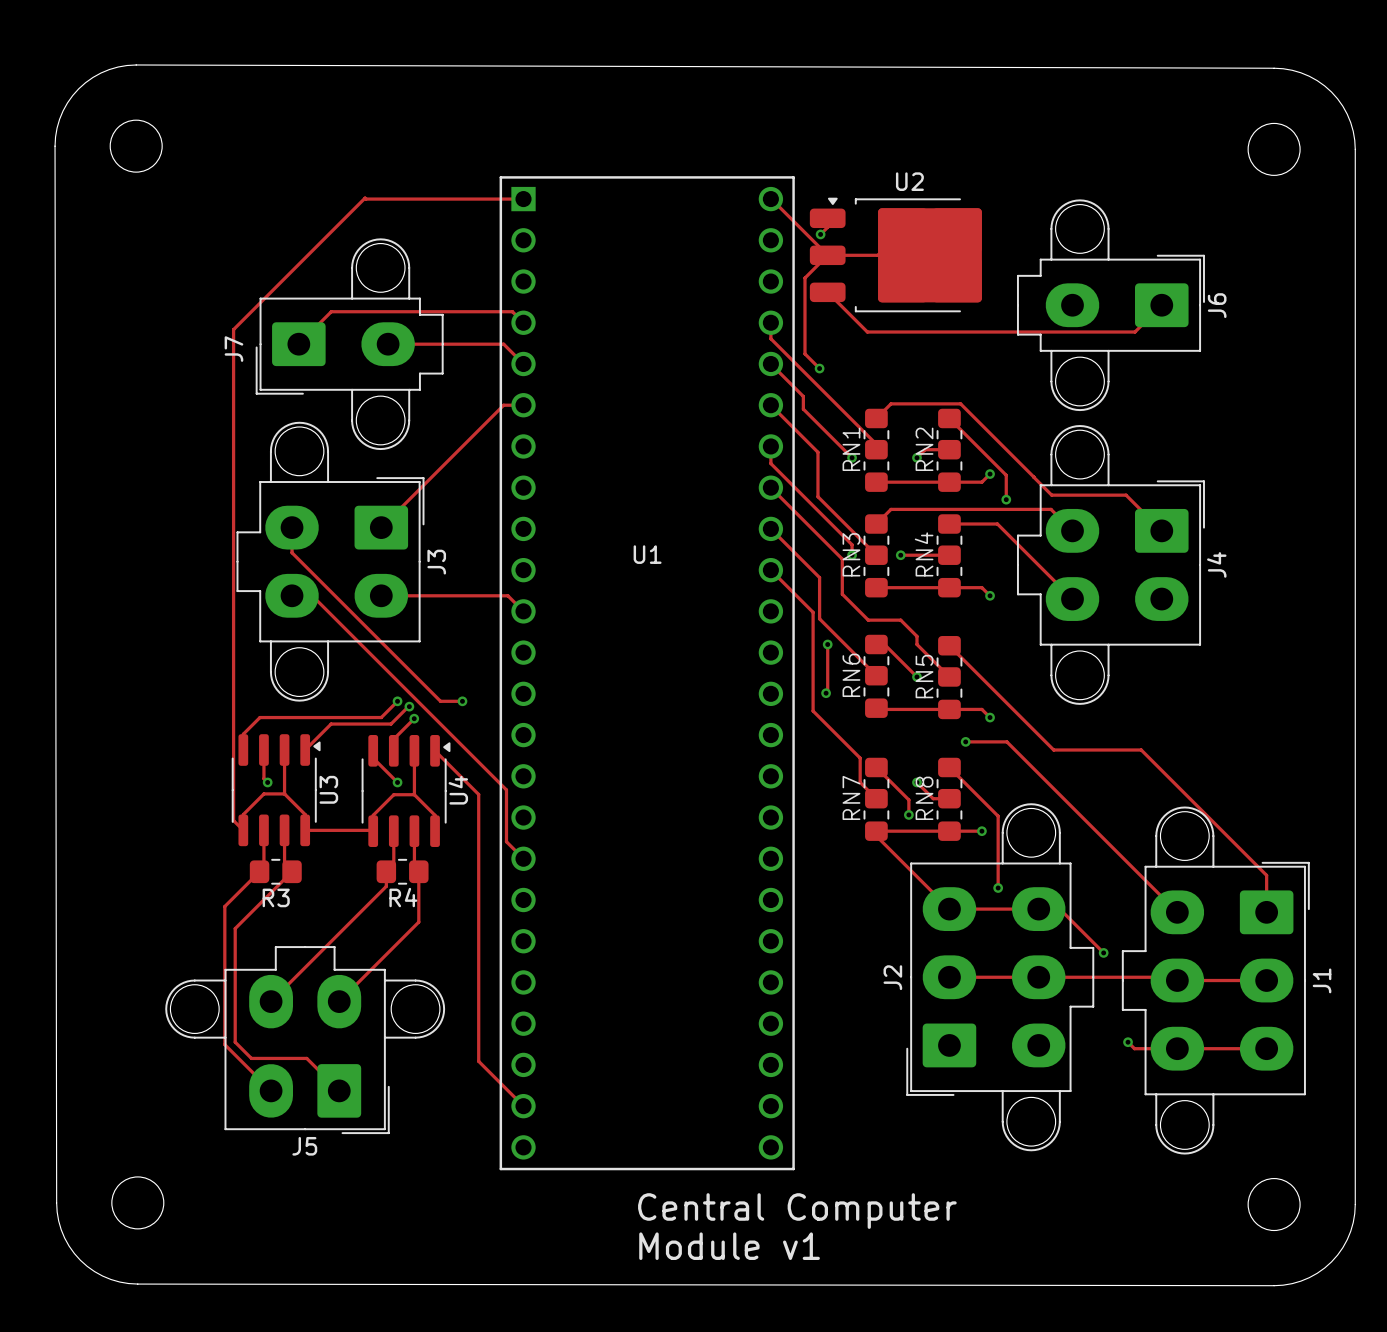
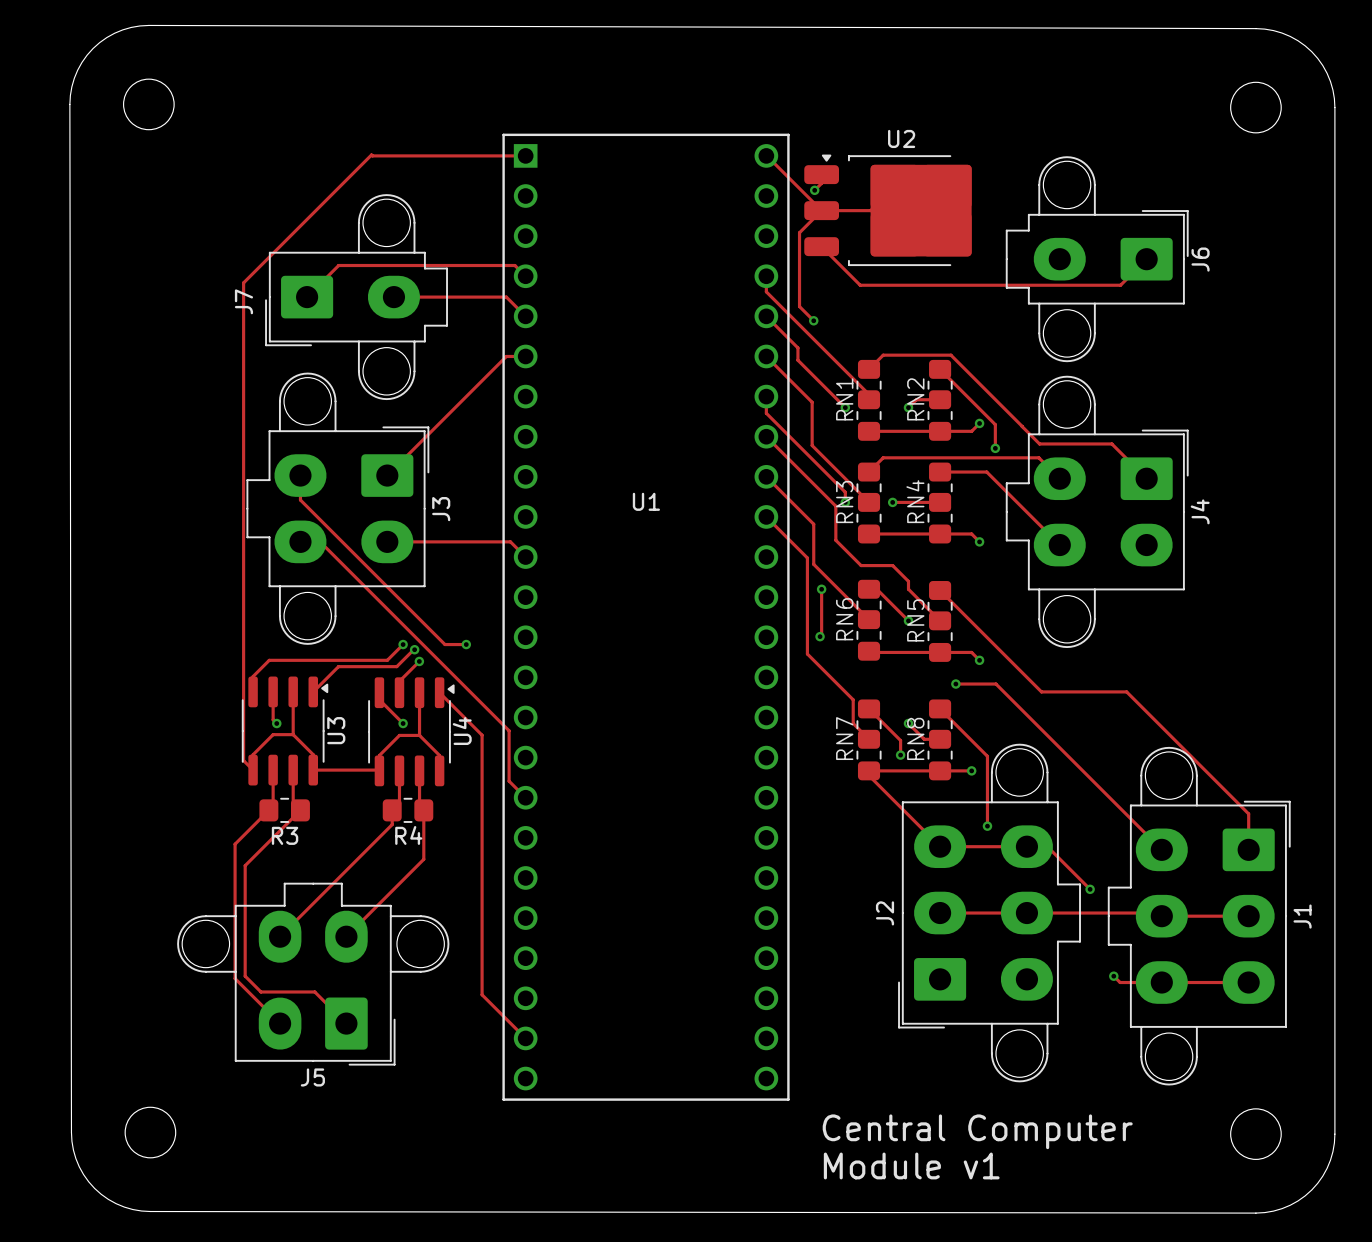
text position: Central Computer (797, 1211) -> Central Computer (977, 1131)
text position: Module v1 (729, 1246) -> Module v1 (911, 1165)

